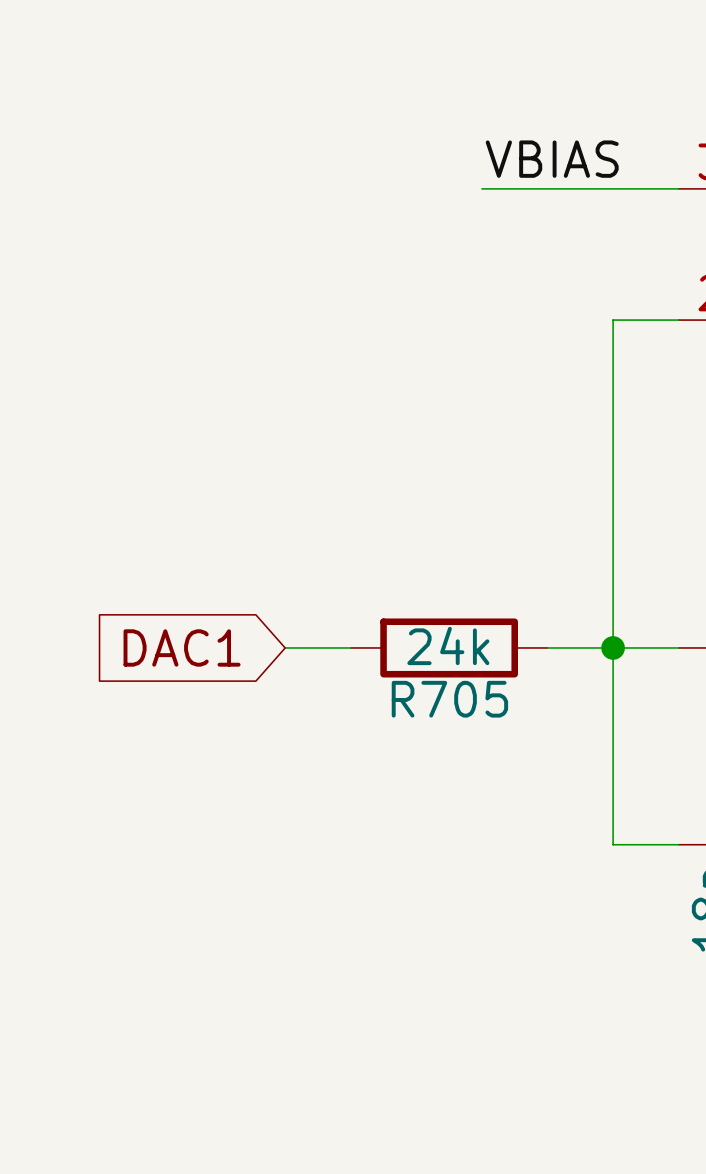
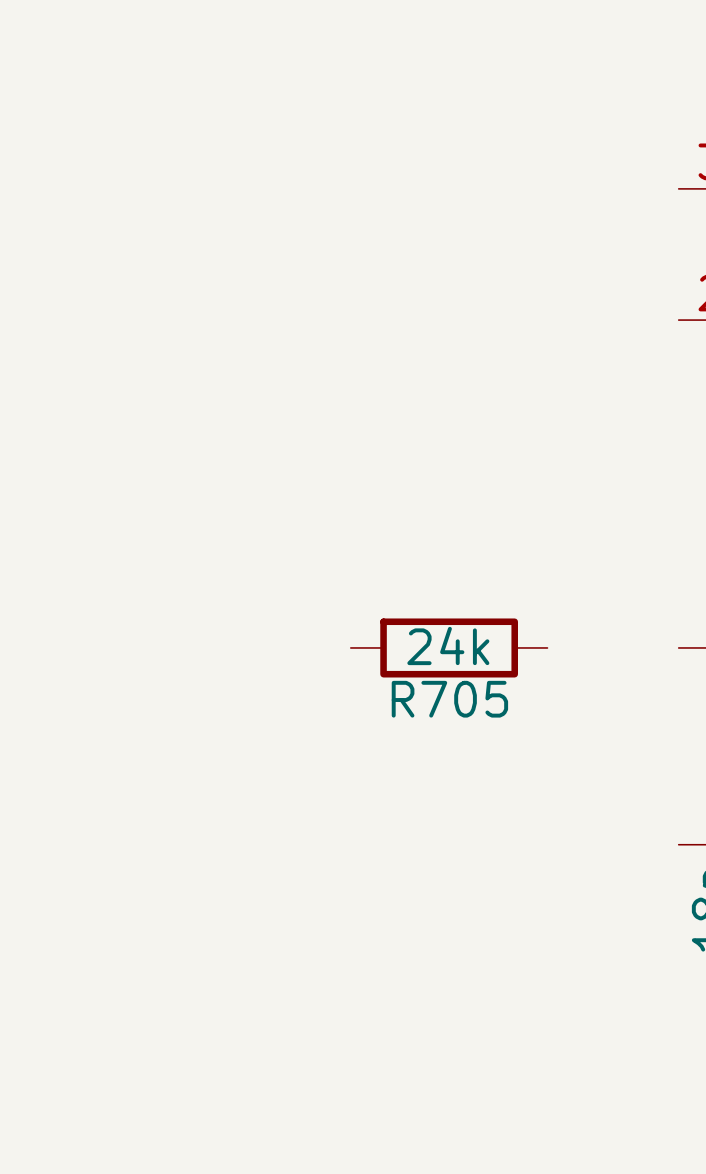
label: VBIAS (552, 159) -> none
wire: (481, 188) (678, 188) -> none
wire: (678, 320) (613, 320) (613, 844) (678, 844) -> none
global label: DAC1 (182, 647) -> none
wire: (285, 647) (350, 647) -> none
wire: (547, 647) (678, 647) -> none
junction: (613, 647) -> none

